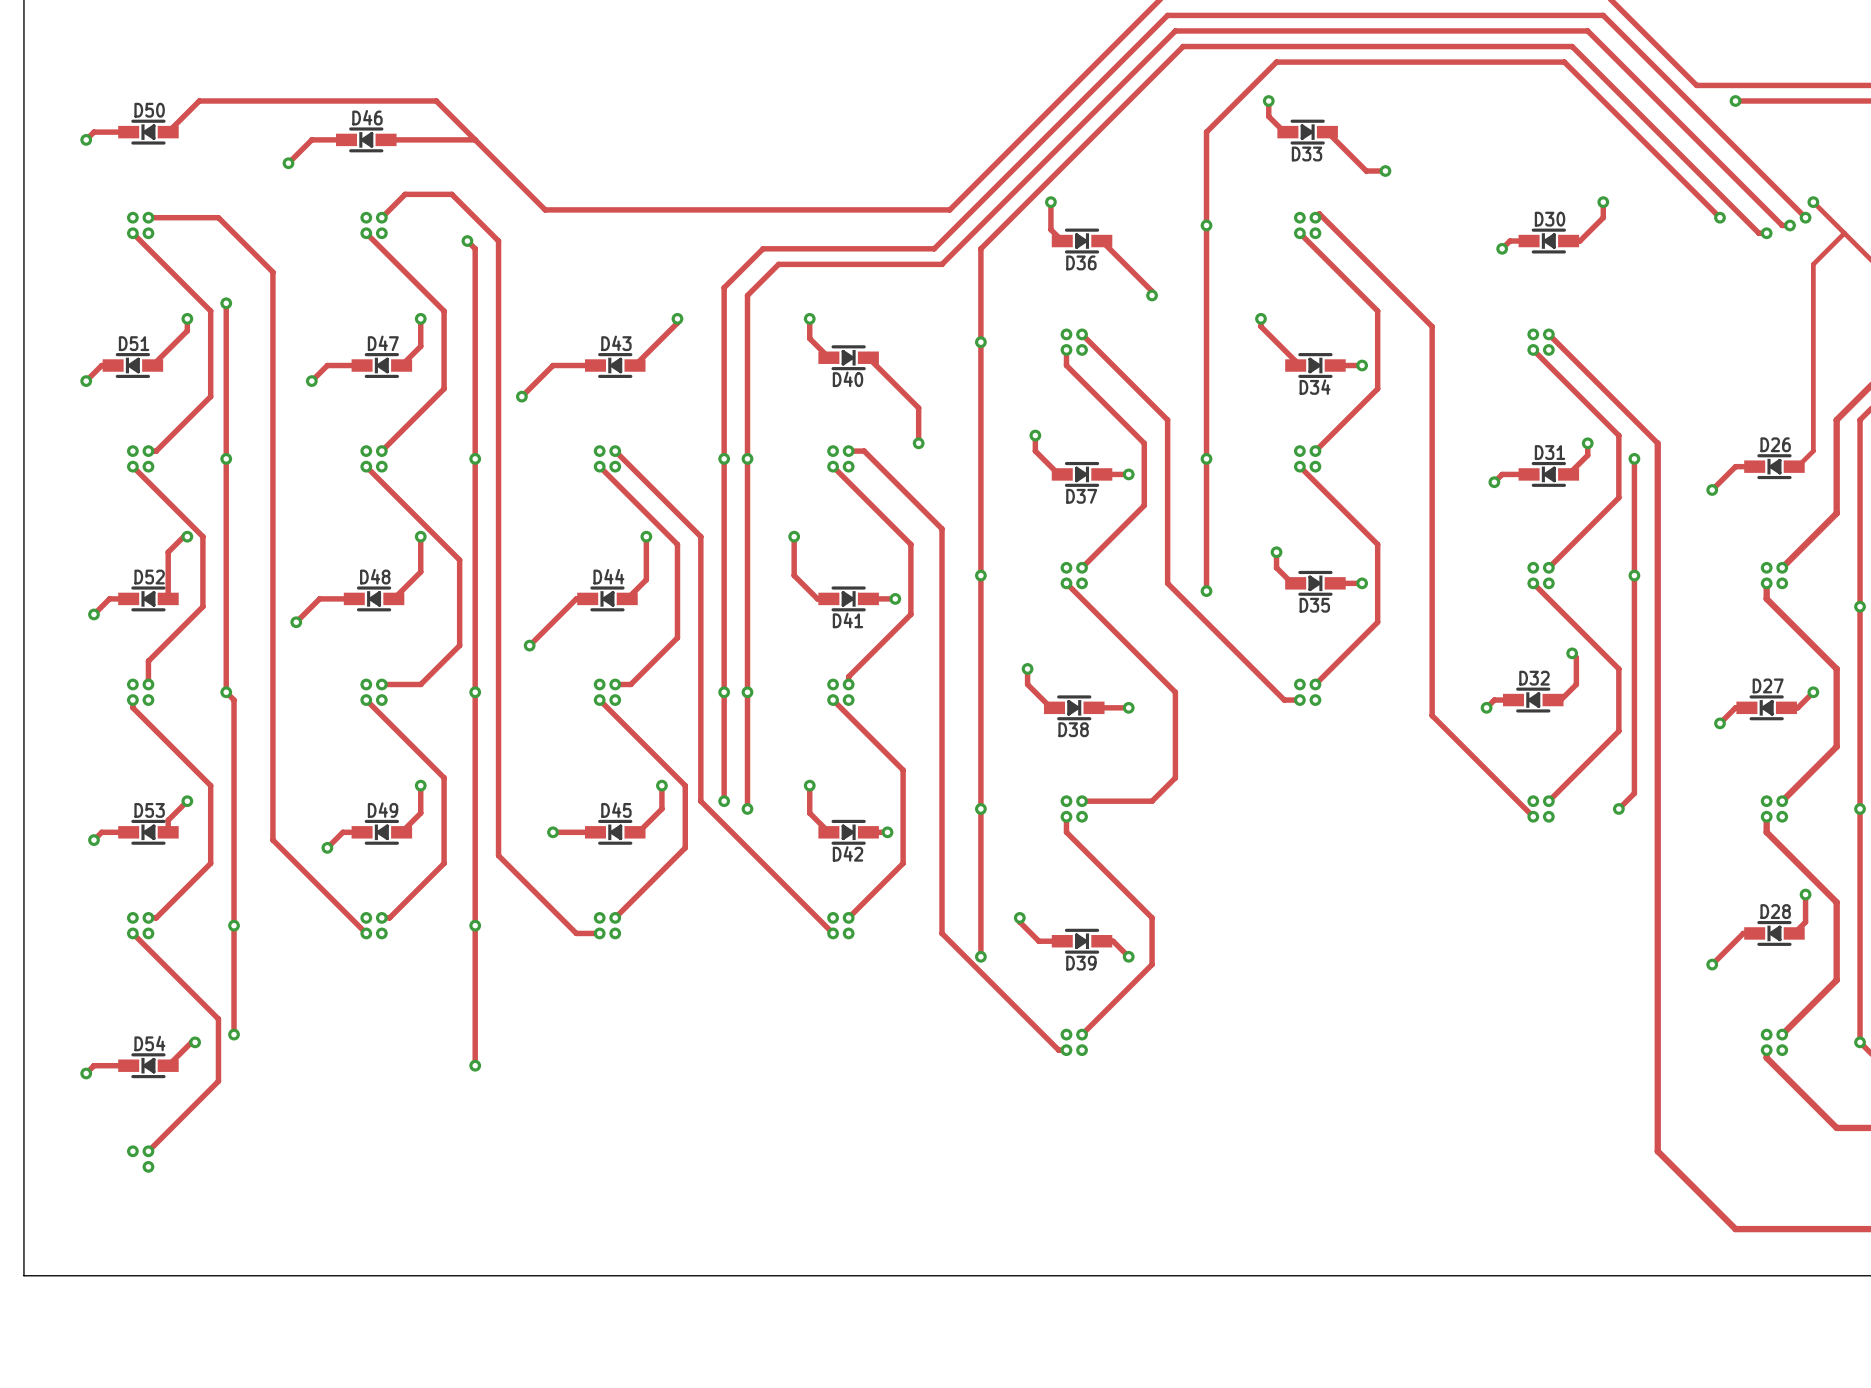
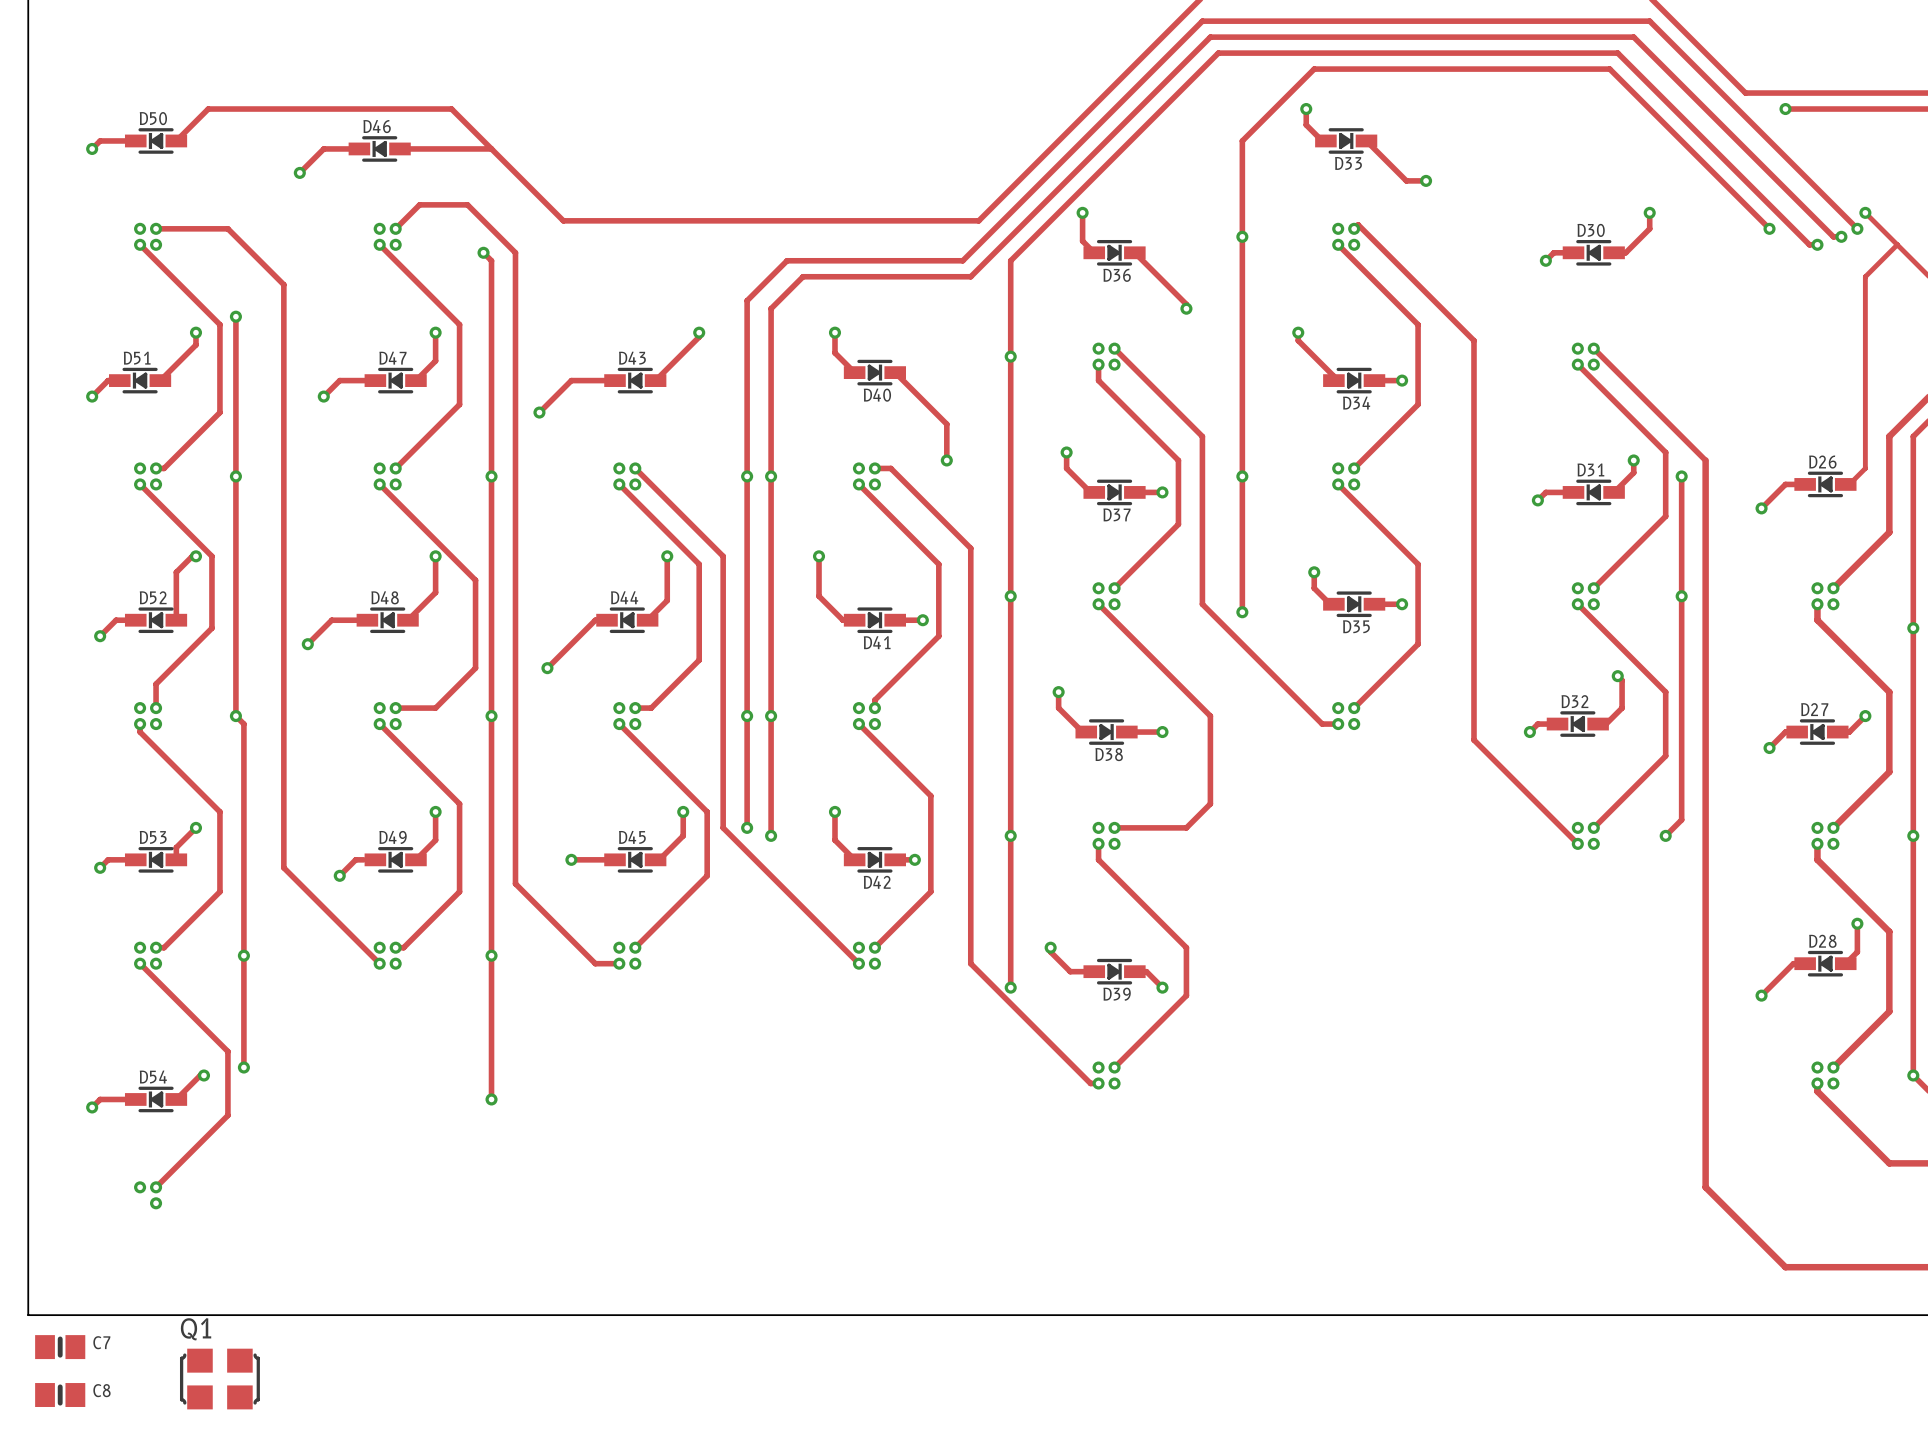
C7: none -> (60, 1347)
Q1: none -> (219, 1379)
C8: none -> (60, 1395)

